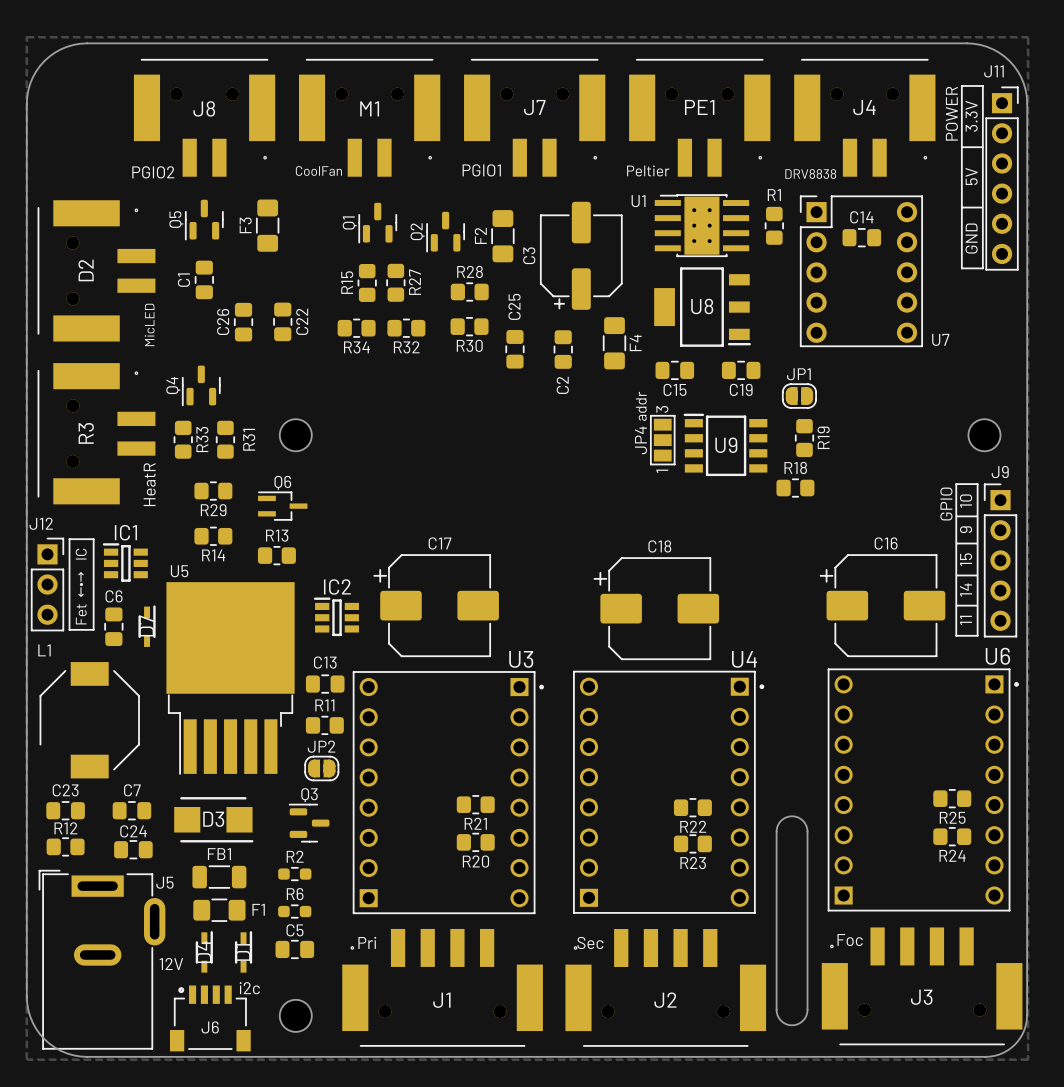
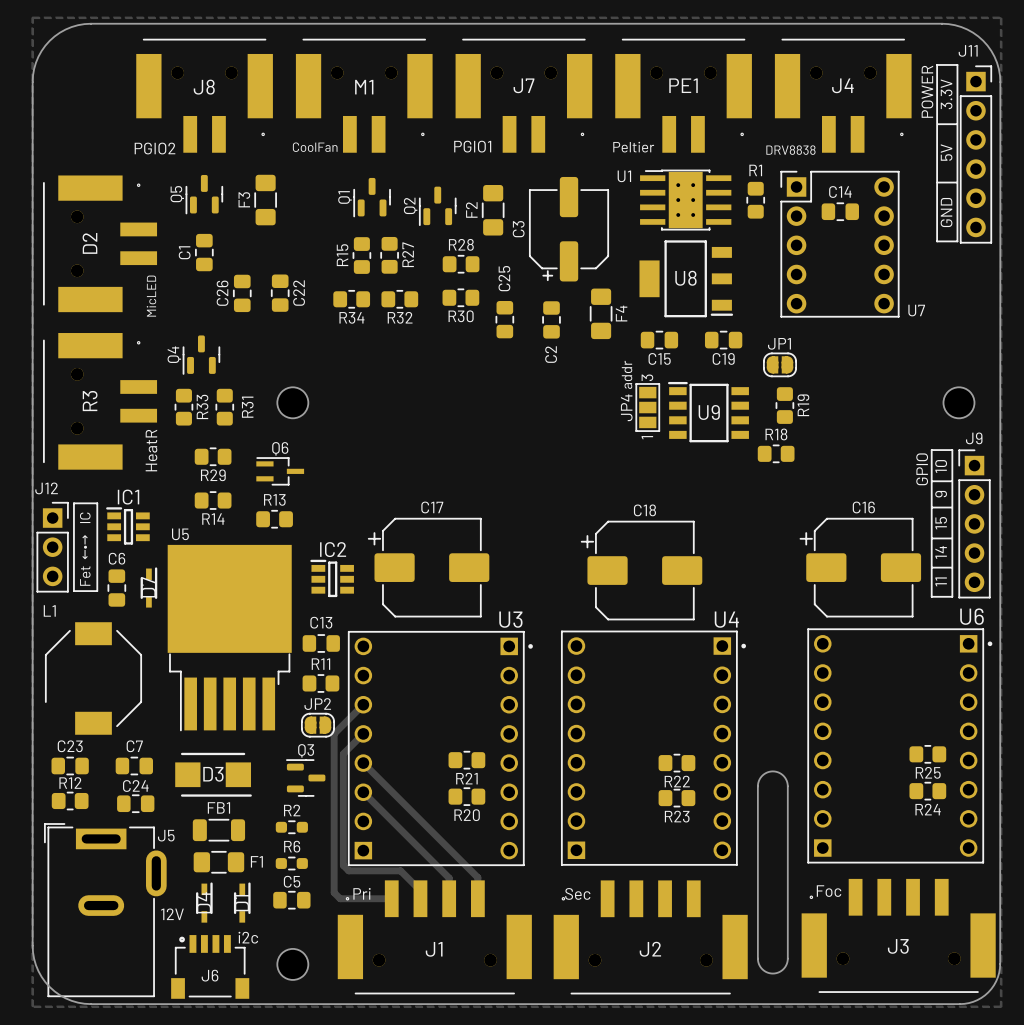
track: none -> (363, 704) (334, 733) (334, 892) (340, 898) (391, 898)
track: none -> (363, 733) (343, 753) (343, 865) (348, 870) (400, 870) (420, 890) (420, 898)
track: none -> (363, 763) (477, 877) (477, 898)
track: none -> (363, 792) (449, 878) (449, 898)

